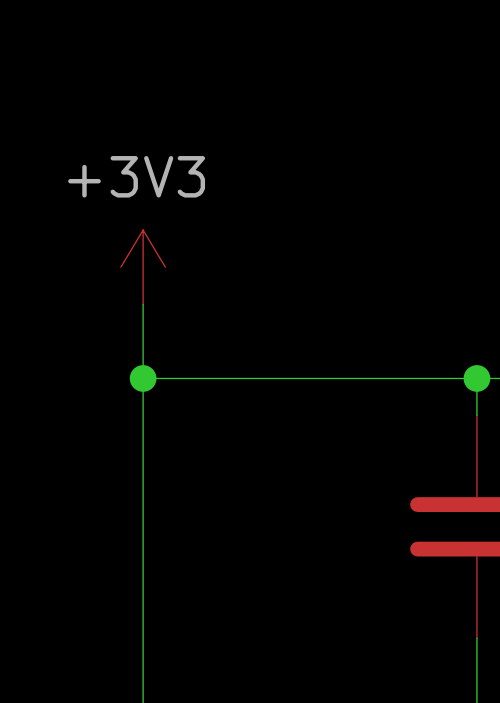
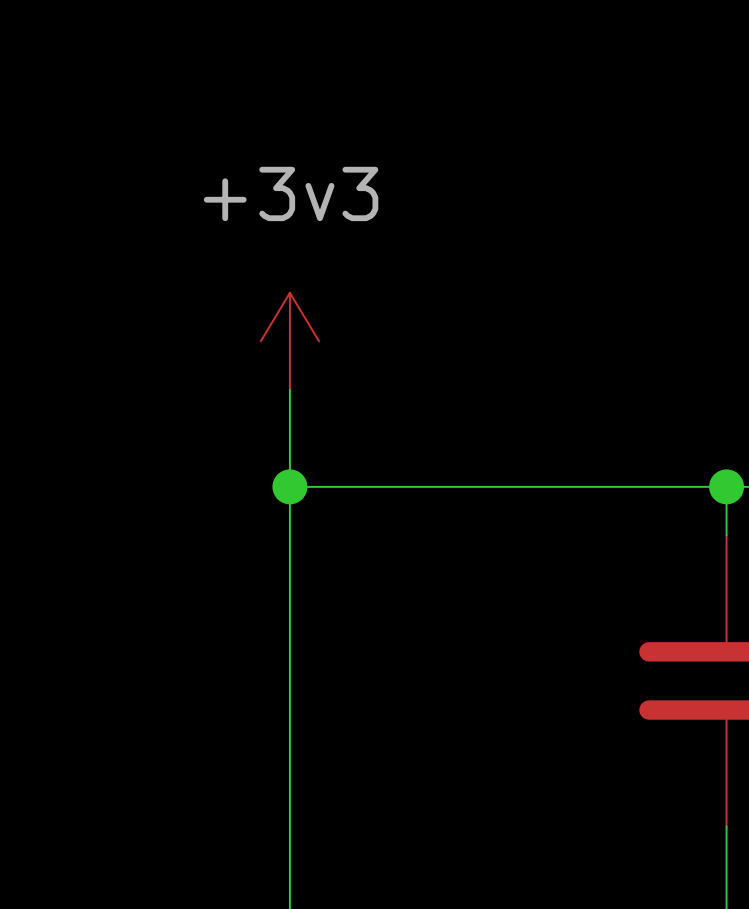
power symbol: +3V3 (143, 267) -> +3v3 (289, 341)

